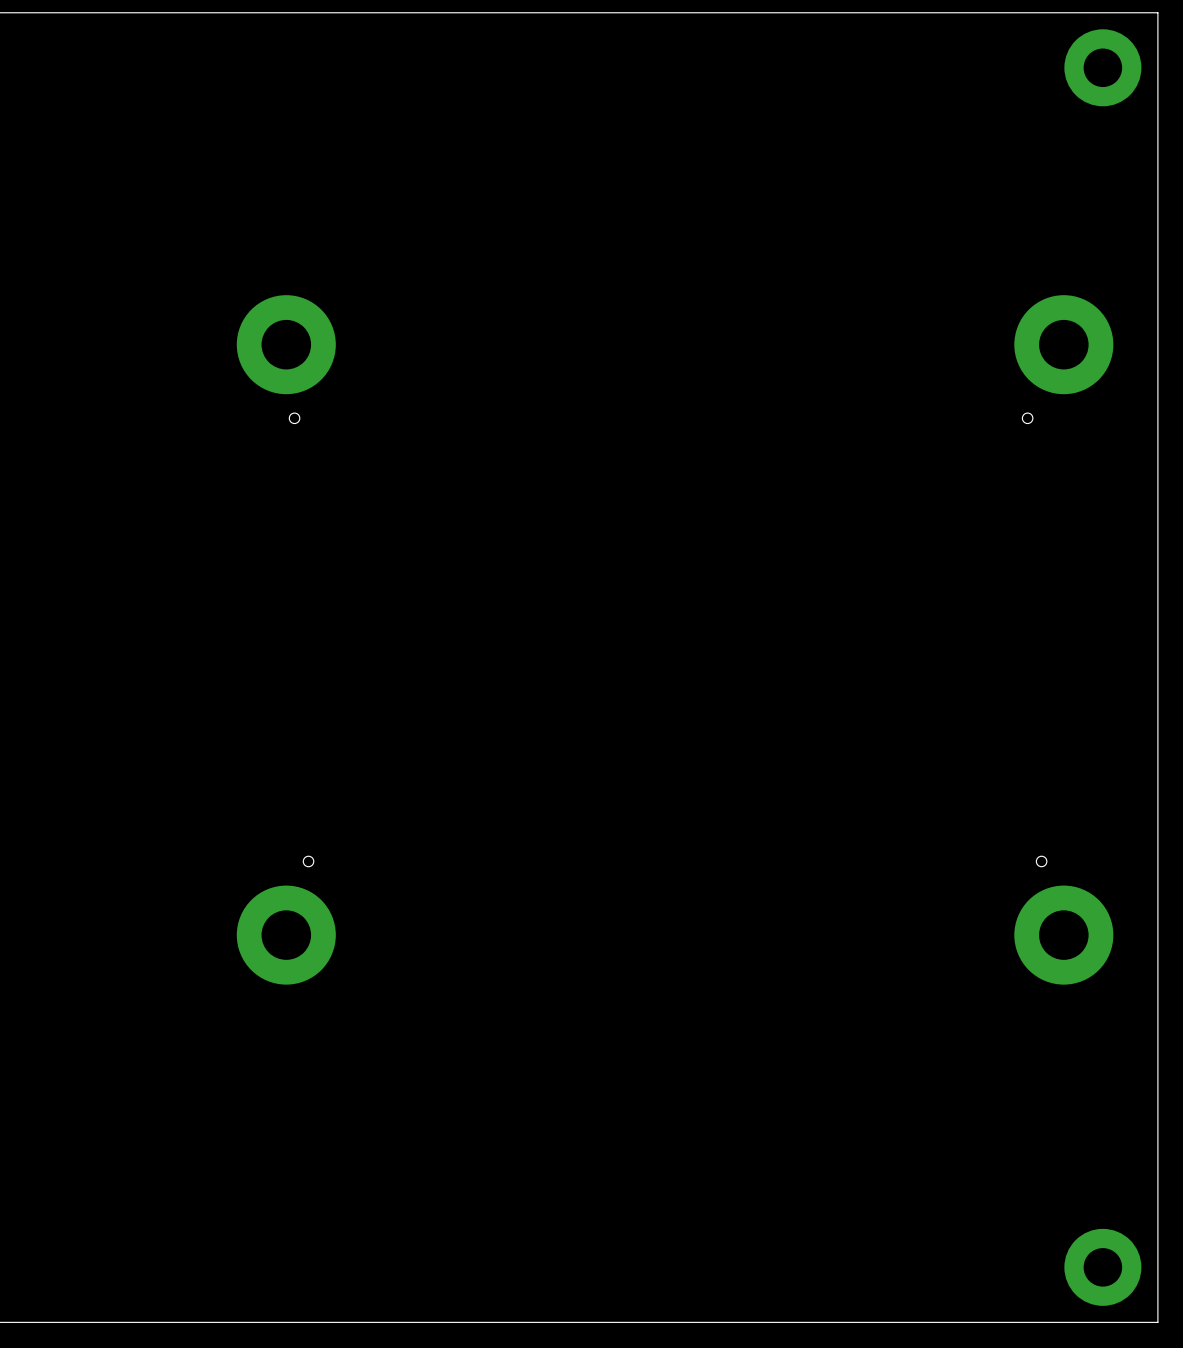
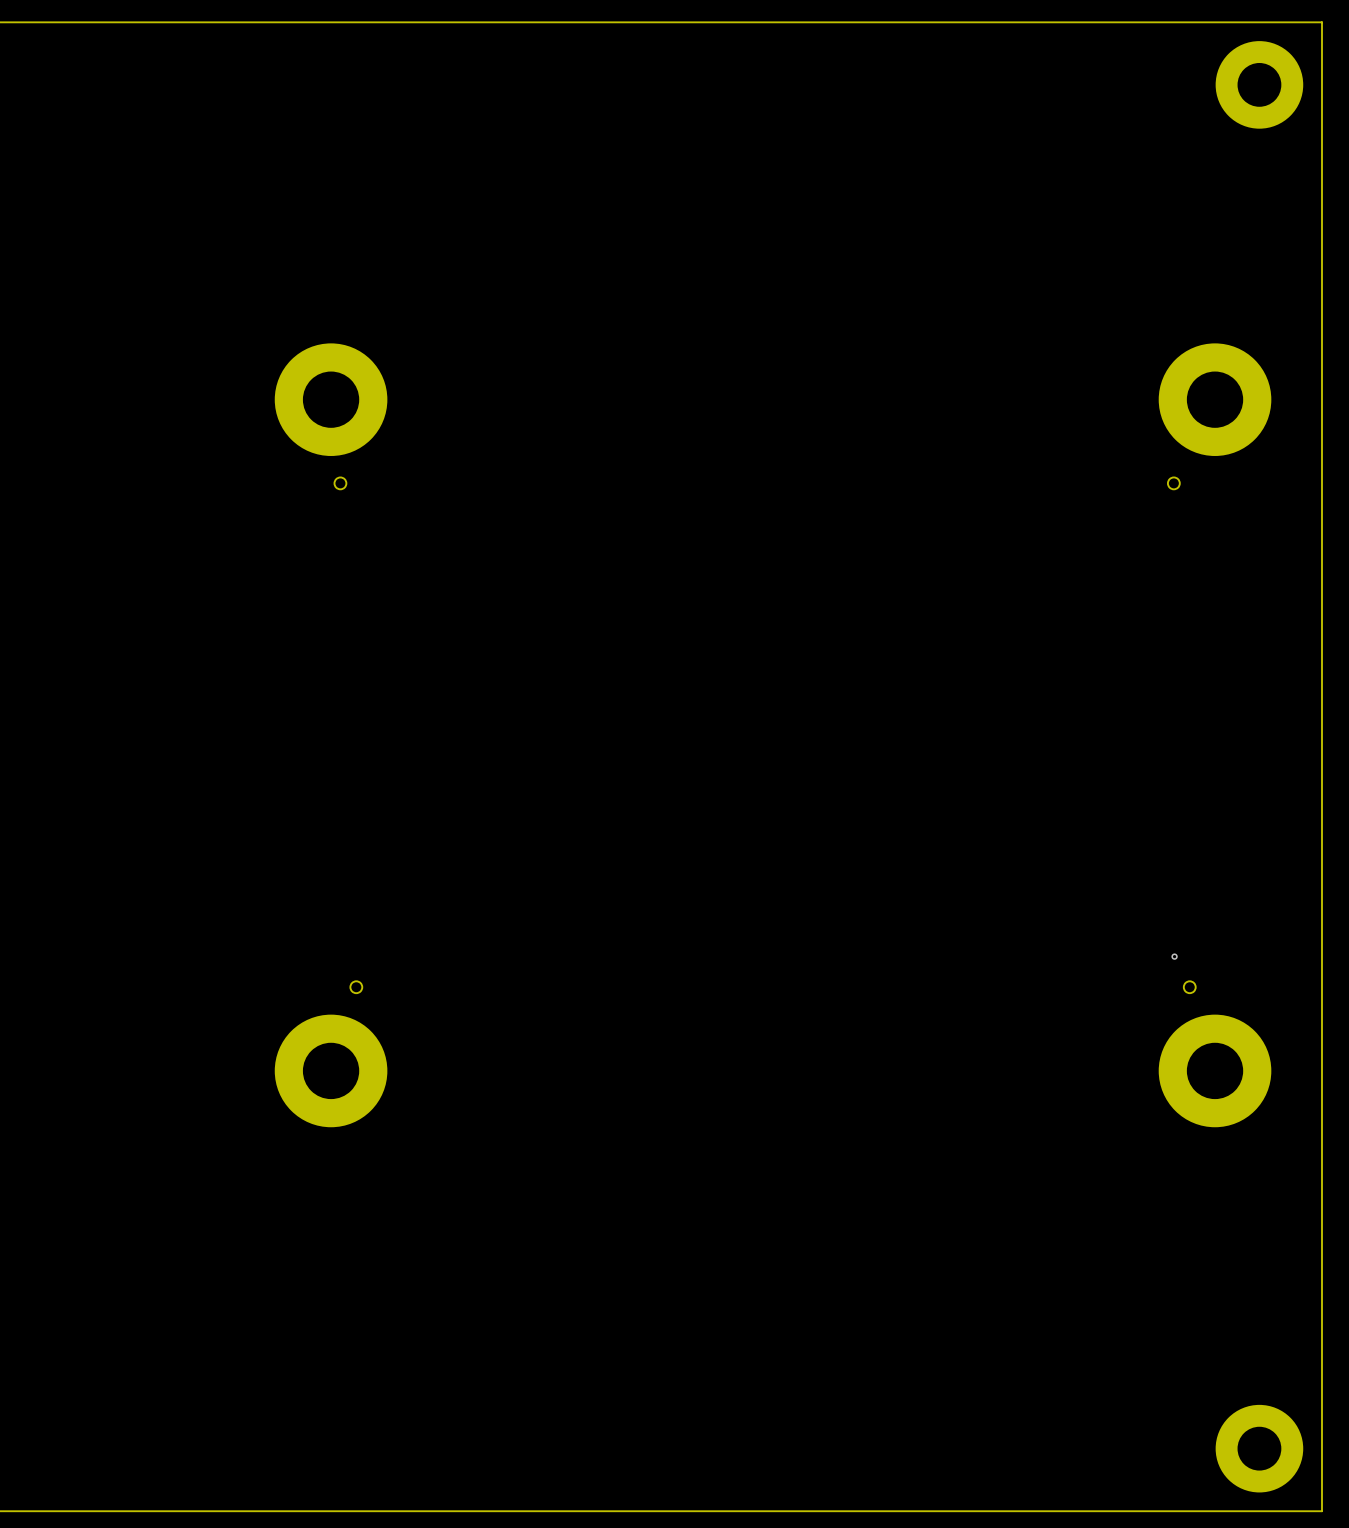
via: none -> (1174, 956)

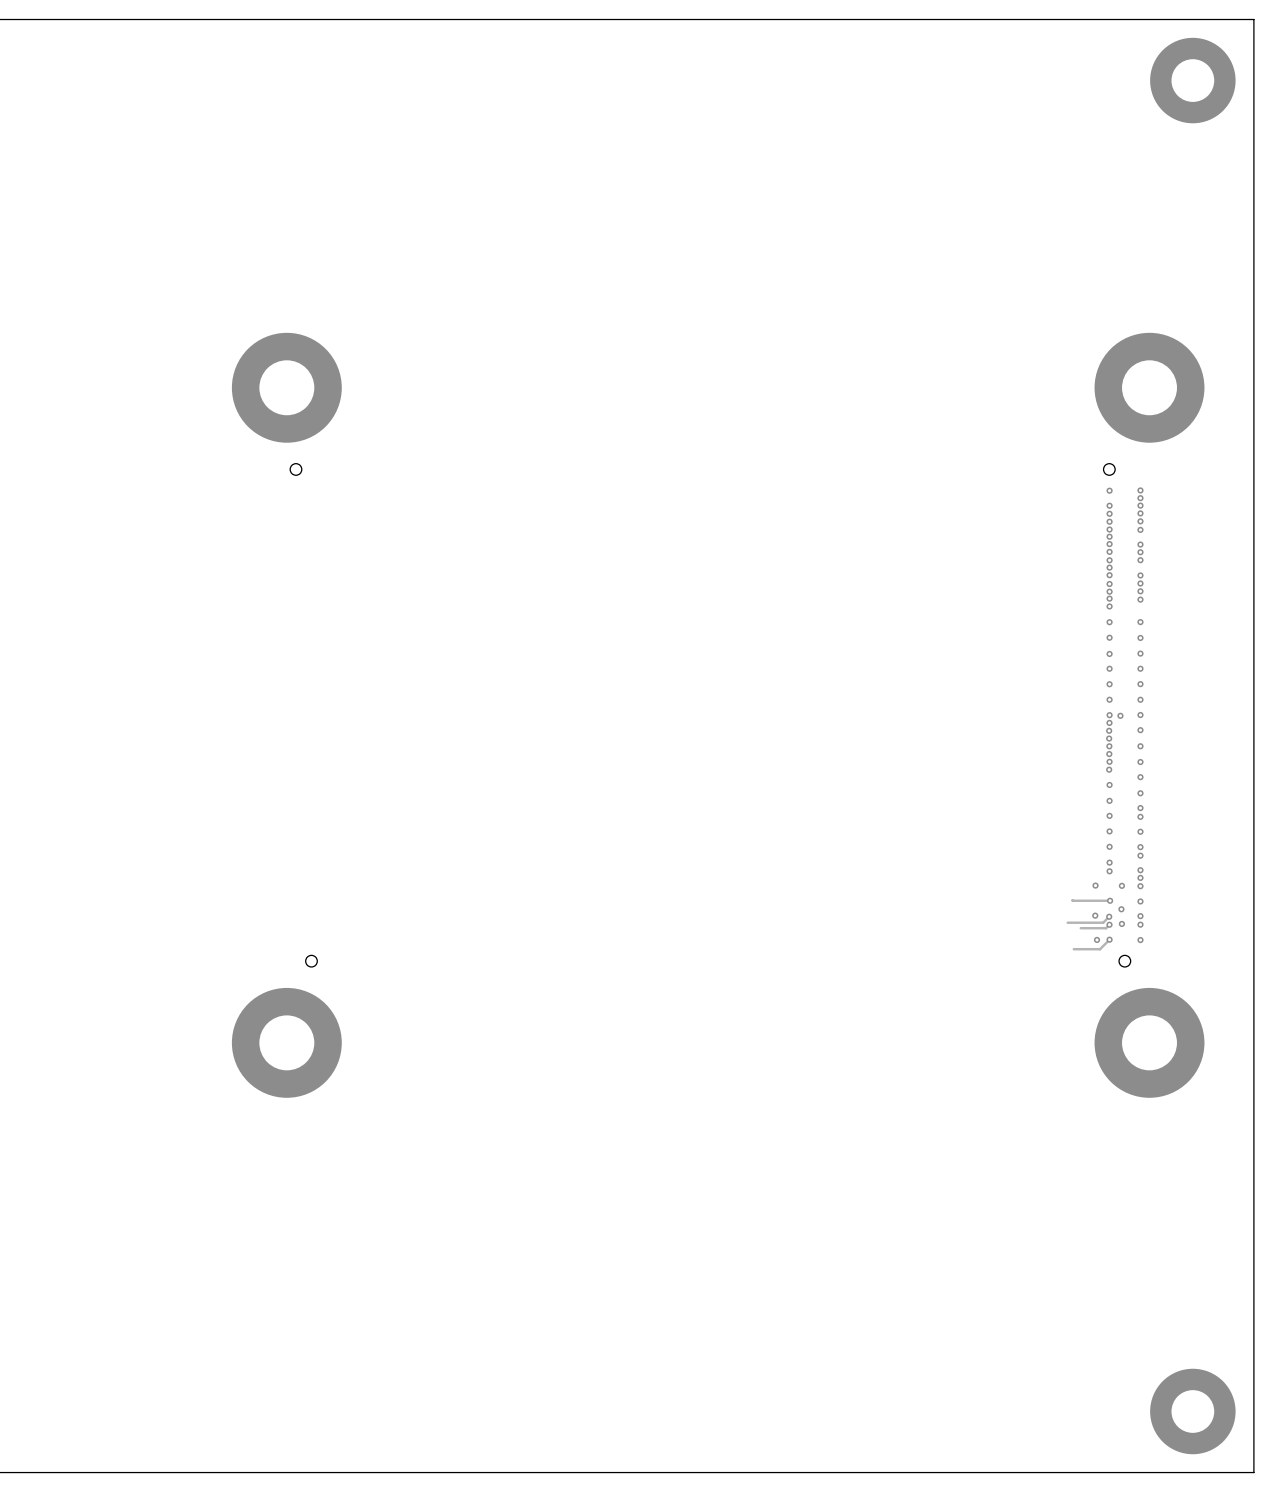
via: none -> (1140, 490)
via: none -> (1109, 490)
via: none -> (1140, 498)
via: none -> (1109, 505)
via: none -> (1140, 505)
via: none -> (1109, 513)
via: none -> (1140, 513)
via: none -> (1109, 521)
via: none -> (1140, 521)
via: none -> (1109, 529)
via: none -> (1140, 529)
via: none -> (1109, 536)
via: none -> (1109, 544)
via: none -> (1140, 544)
via: none -> (1109, 551)
via: none -> (1140, 552)
via: none -> (1109, 560)
via: none -> (1140, 560)
via: none -> (1109, 567)
via: none -> (1109, 575)
via: none -> (1140, 575)
via: none -> (1109, 583)
via: none -> (1140, 583)
via: none -> (1109, 591)
via: none -> (1140, 591)
via: none -> (1109, 598)
via: none -> (1140, 599)
via: none -> (1109, 606)
via: none -> (1109, 622)
via: none -> (1140, 622)
via: none -> (1109, 637)
via: none -> (1140, 637)
via: none -> (1109, 653)
via: none -> (1140, 653)
via: none -> (1109, 668)
via: none -> (1140, 668)
via: none -> (1109, 684)
via: none -> (1140, 684)
via: none -> (1109, 699)
via: none -> (1140, 699)
via: none -> (1109, 715)
via: none -> (1120, 715)
via: none -> (1140, 715)
via: none -> (1109, 722)
via: none -> (1140, 730)
via: none -> (1109, 730)
via: none -> (1109, 738)
via: none -> (1109, 746)
via: none -> (1140, 746)
via: none -> (1109, 754)
via: none -> (1109, 761)
via: none -> (1140, 762)
via: none -> (1109, 769)
via: none -> (1140, 777)
via: none -> (1109, 784)
via: none -> (1140, 793)
via: none -> (1109, 800)
via: none -> (1140, 808)
via: none -> (1109, 815)
via: none -> (1140, 816)
via: none -> (1109, 831)
via: none -> (1140, 831)
via: none -> (1109, 846)
via: none -> (1140, 847)
via: none -> (1140, 855)
via: none -> (1109, 862)
via: none -> (1140, 870)
via: none -> (1109, 871)
via: none -> (1140, 877)
via: none -> (1095, 885)
via: none -> (1121, 885)
via: none -> (1140, 886)
track: none -> (1072, 900) (1110, 900)
via: none -> (1110, 900)
via: none -> (1140, 901)
via: none -> (1121, 909)
via: none -> (1095, 915)
track: none -> (1109, 916) (1103, 922) (1067, 922)
via: none -> (1109, 916)
via: none -> (1140, 916)
track: none -> (1109, 924) (1106, 928) (1080, 928)
via: none -> (1109, 924)
via: none -> (1121, 923)
via: none -> (1140, 924)
via: (1174, 956) -> none
via: none -> (1097, 939)
track: none -> (1109, 939) (1100, 949) (1073, 949)
via: none -> (1109, 939)
via: none -> (1140, 940)

